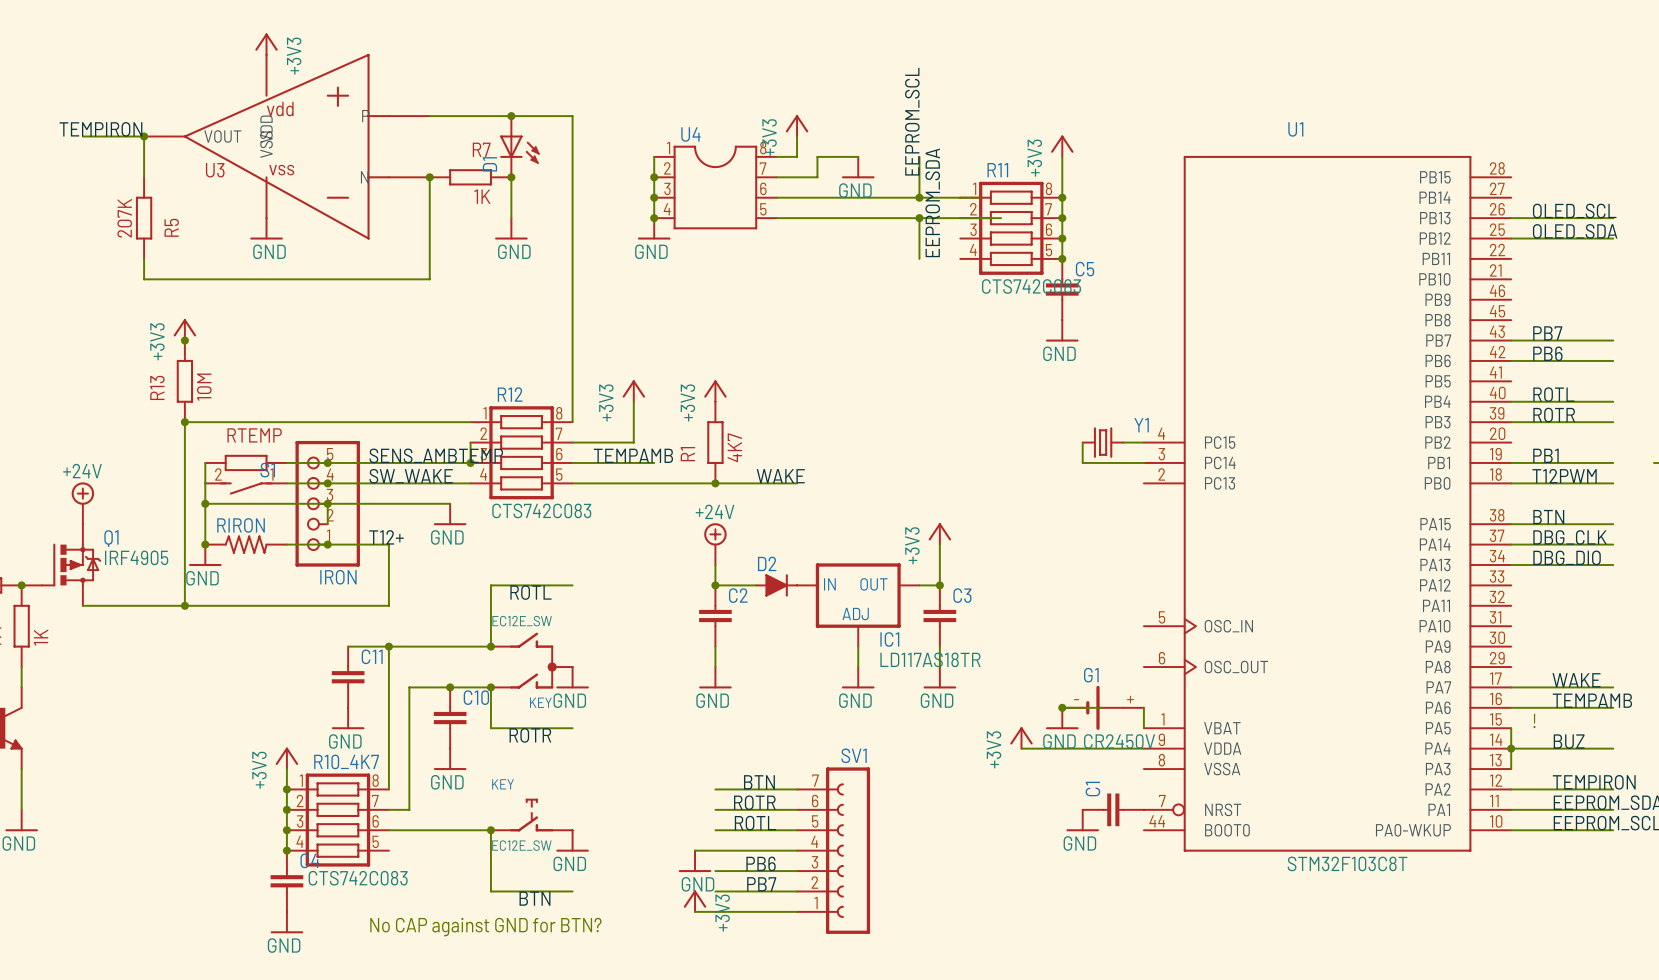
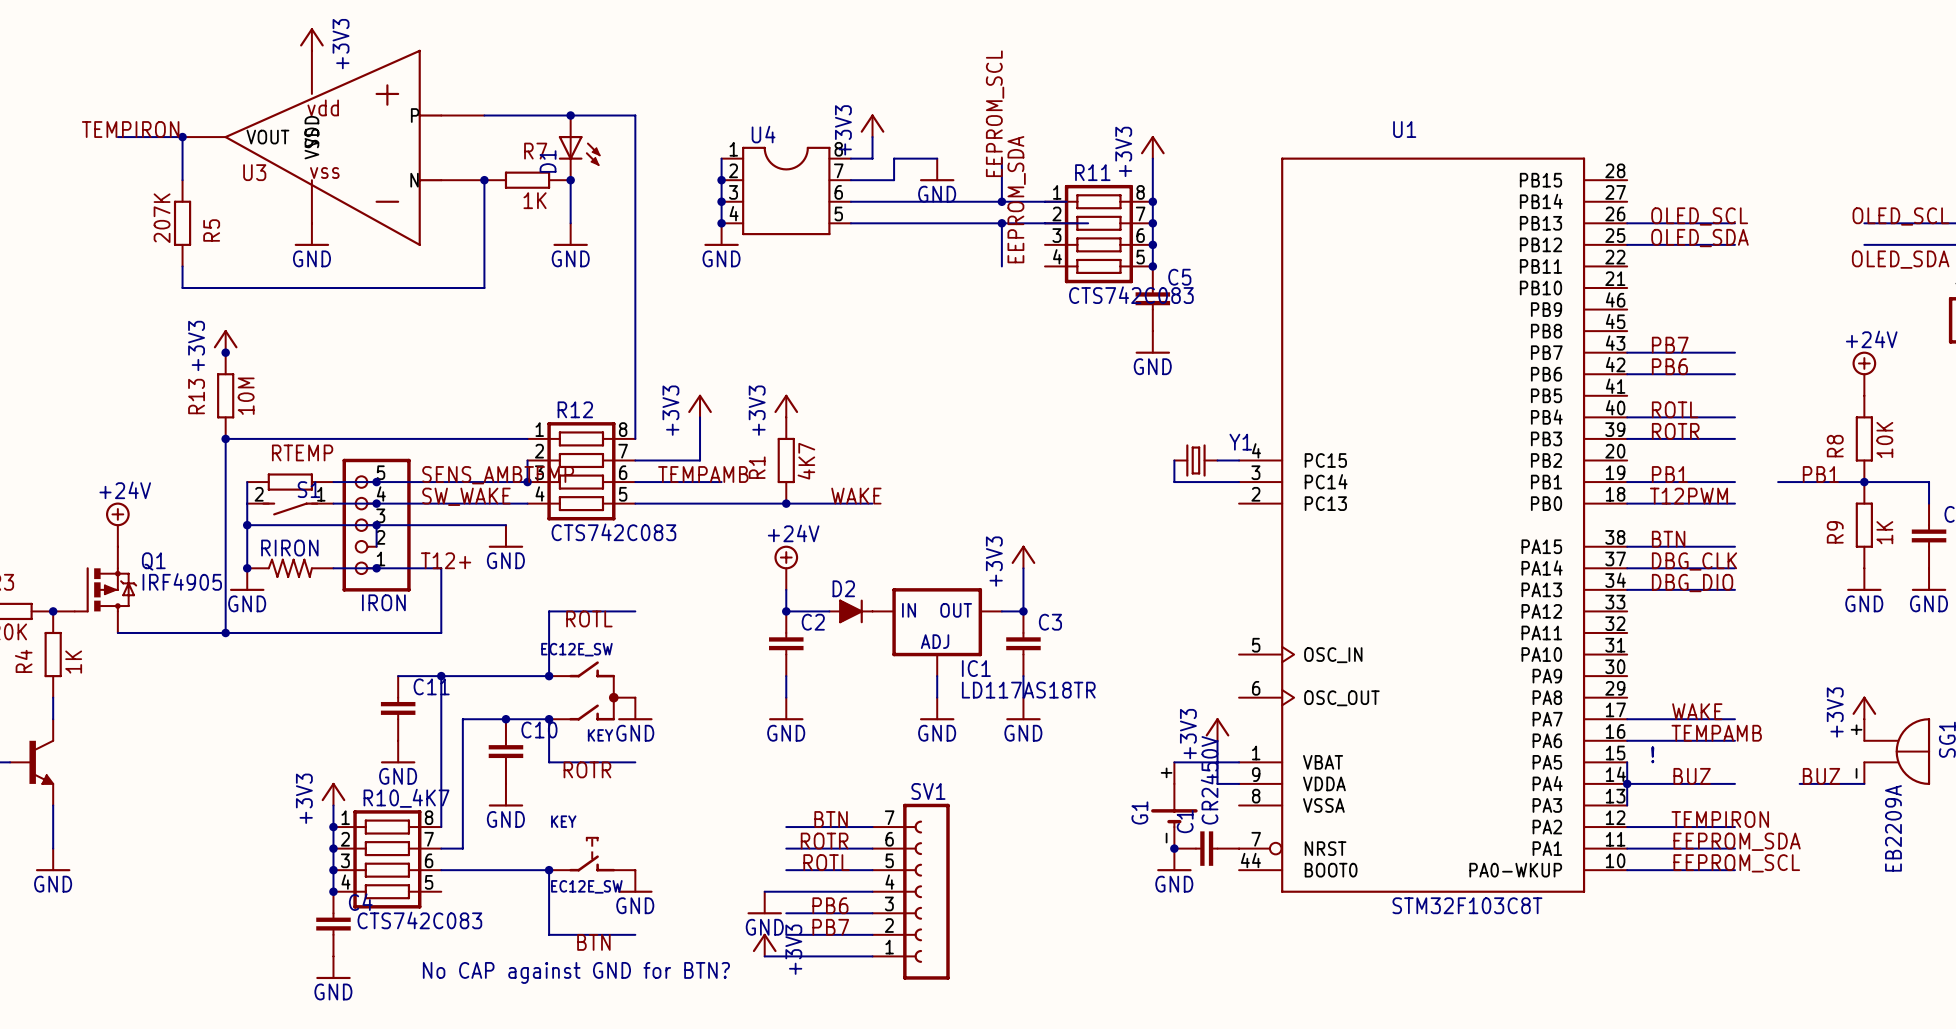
wire: (1062, 707) (1103, 707) -> none
junction: (1062, 707) -> none
G1 rotation: 0° (1103, 707) -> 90° counterclockwise (1174, 805)
G1 position: (1103, 707) -> (1174, 805)
wire: (1143, 707) (1143, 728) -> (1174, 762) (1239, 762)
power symbol: GND (1062, 718) -> none
power symbol position: +3V3 (1021, 737) -> +3V3 (1217, 729)
wire: (1021, 748) (1123, 748) -> (1217, 740) (1217, 783)
junction: none -> (1174, 848)

